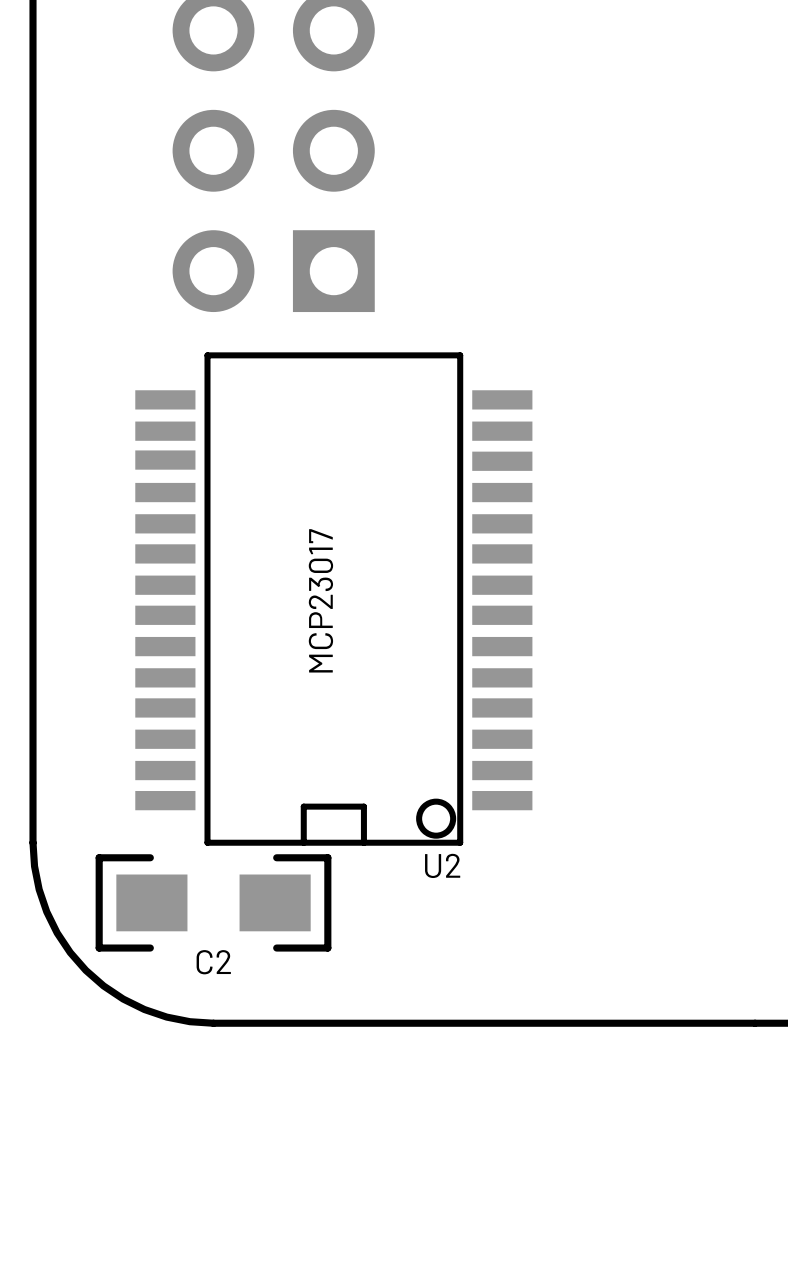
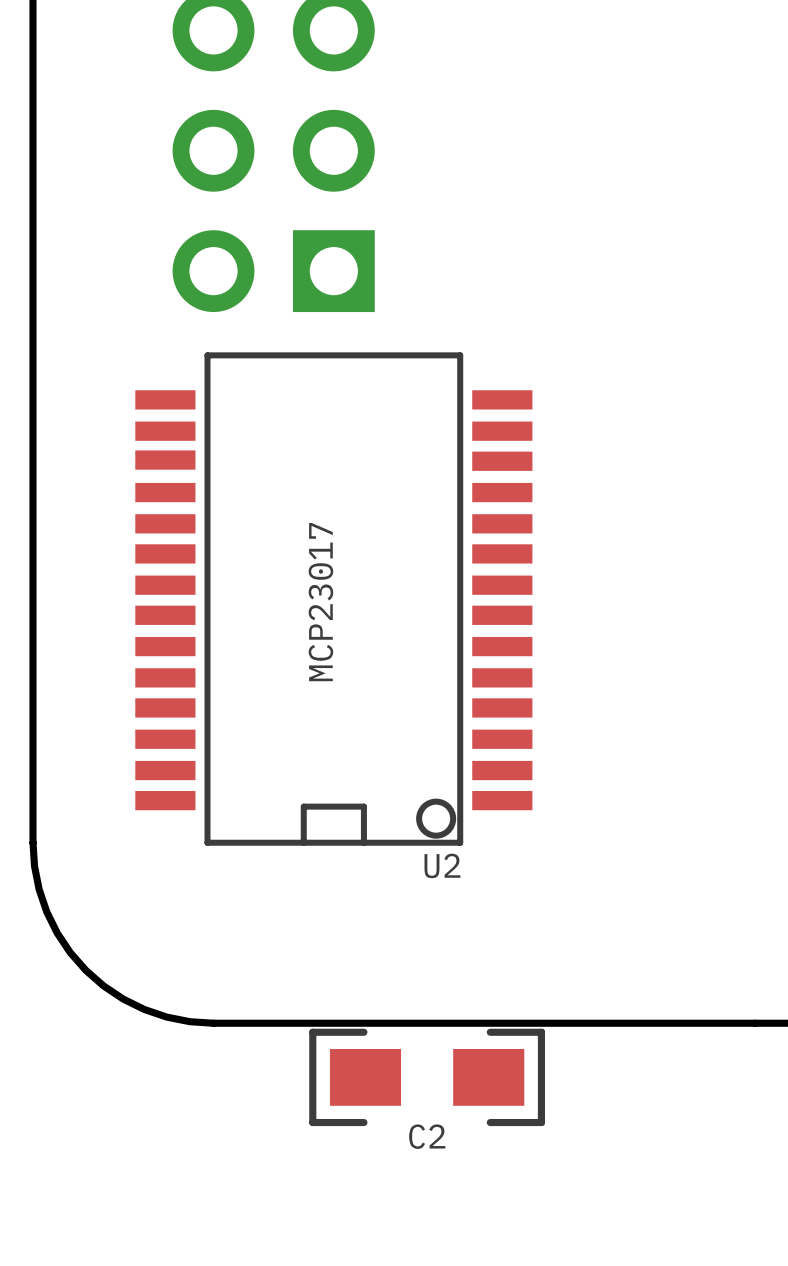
C2 position: (213, 902) -> (427, 1077)

